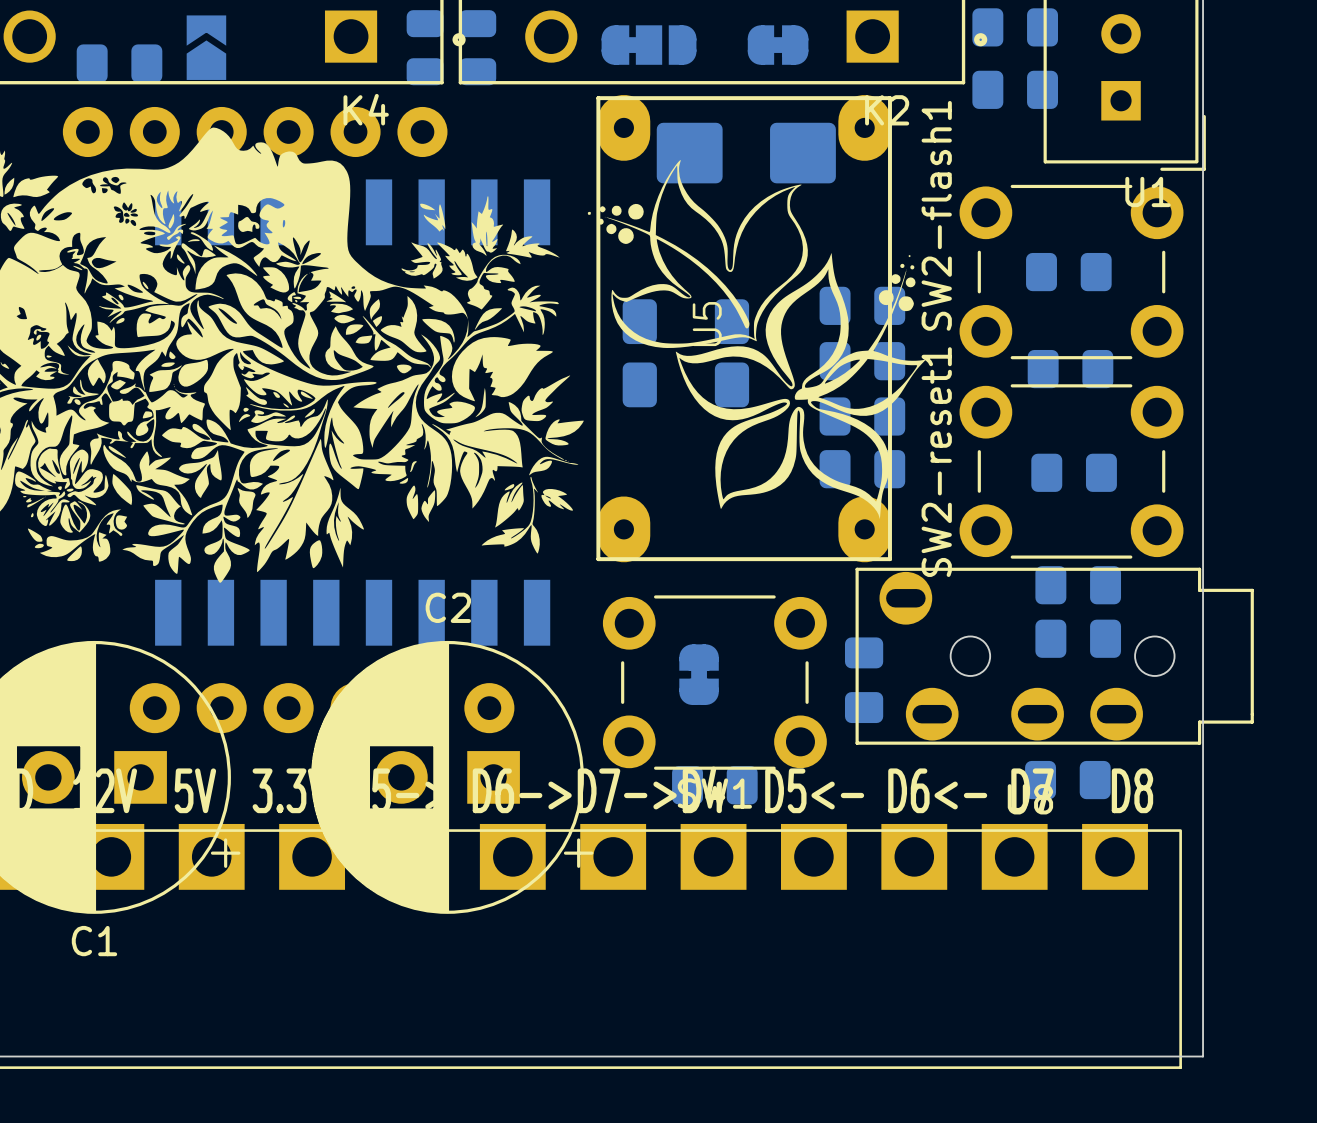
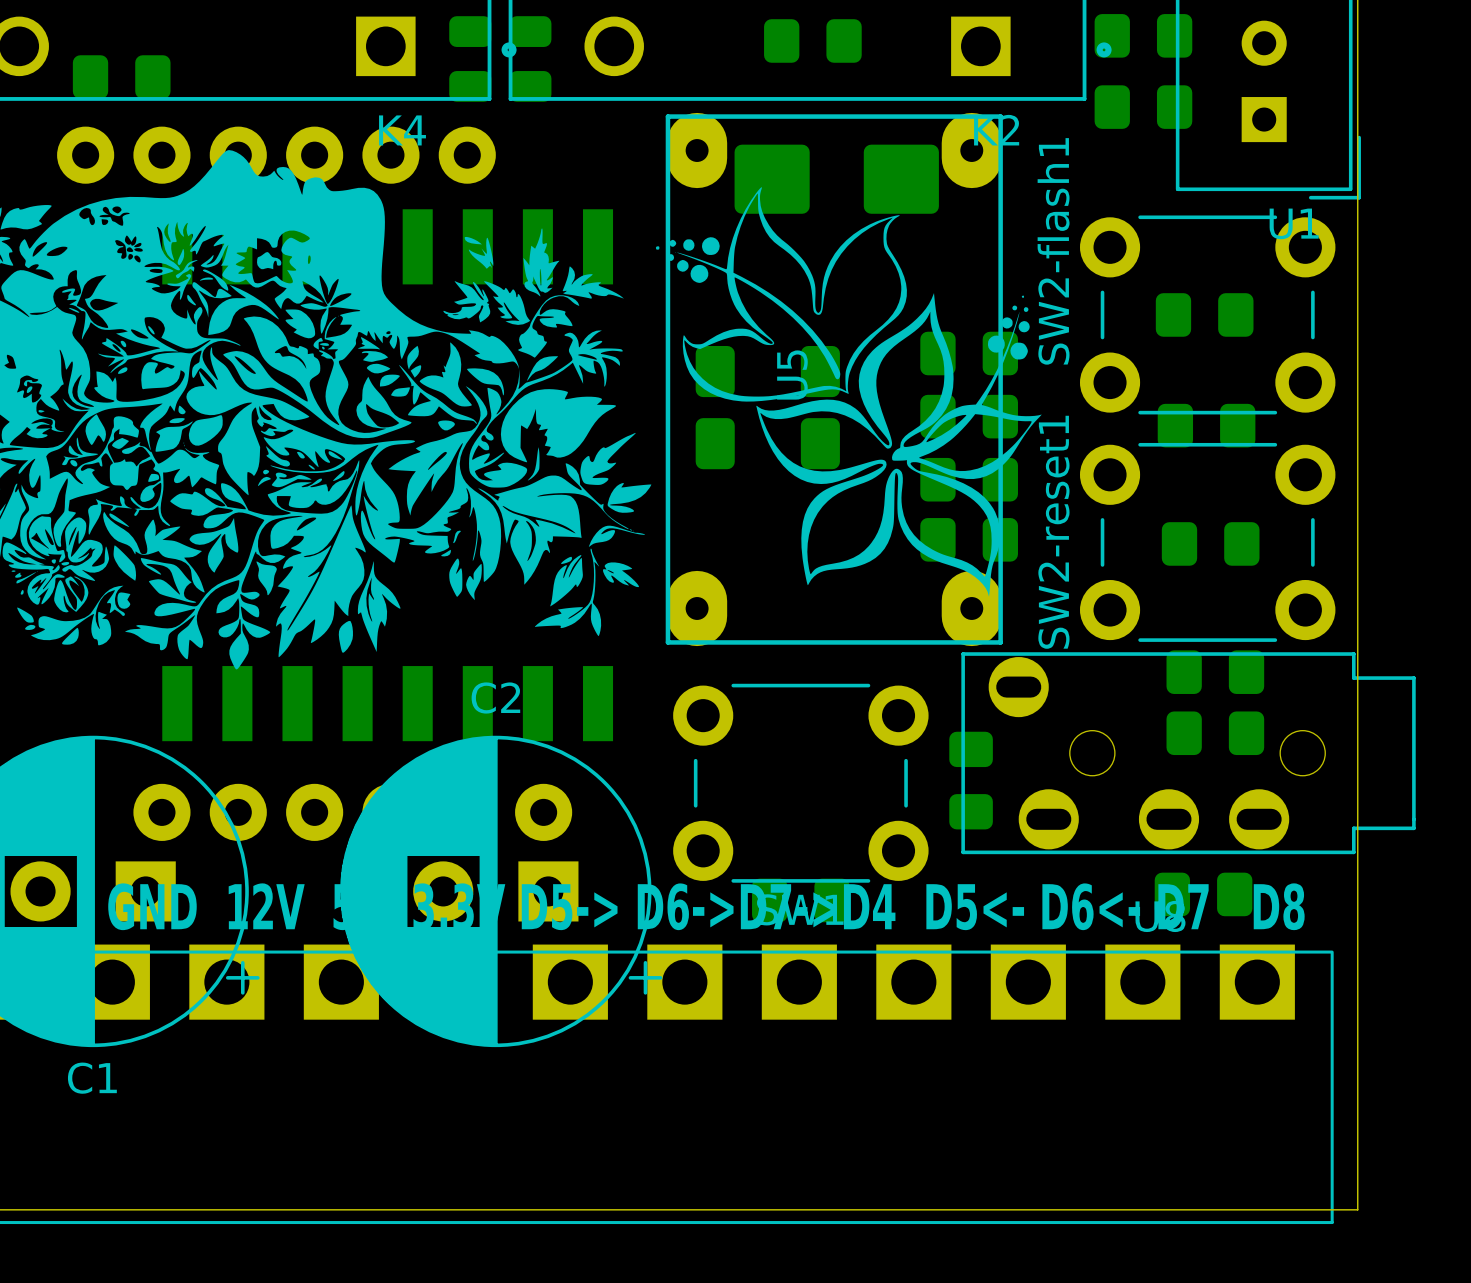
part: none -> (812, 40)
part: (649, 45) -> none
part: (778, 45) -> none
part: (206, 47) -> none
part: (699, 674) -> none

